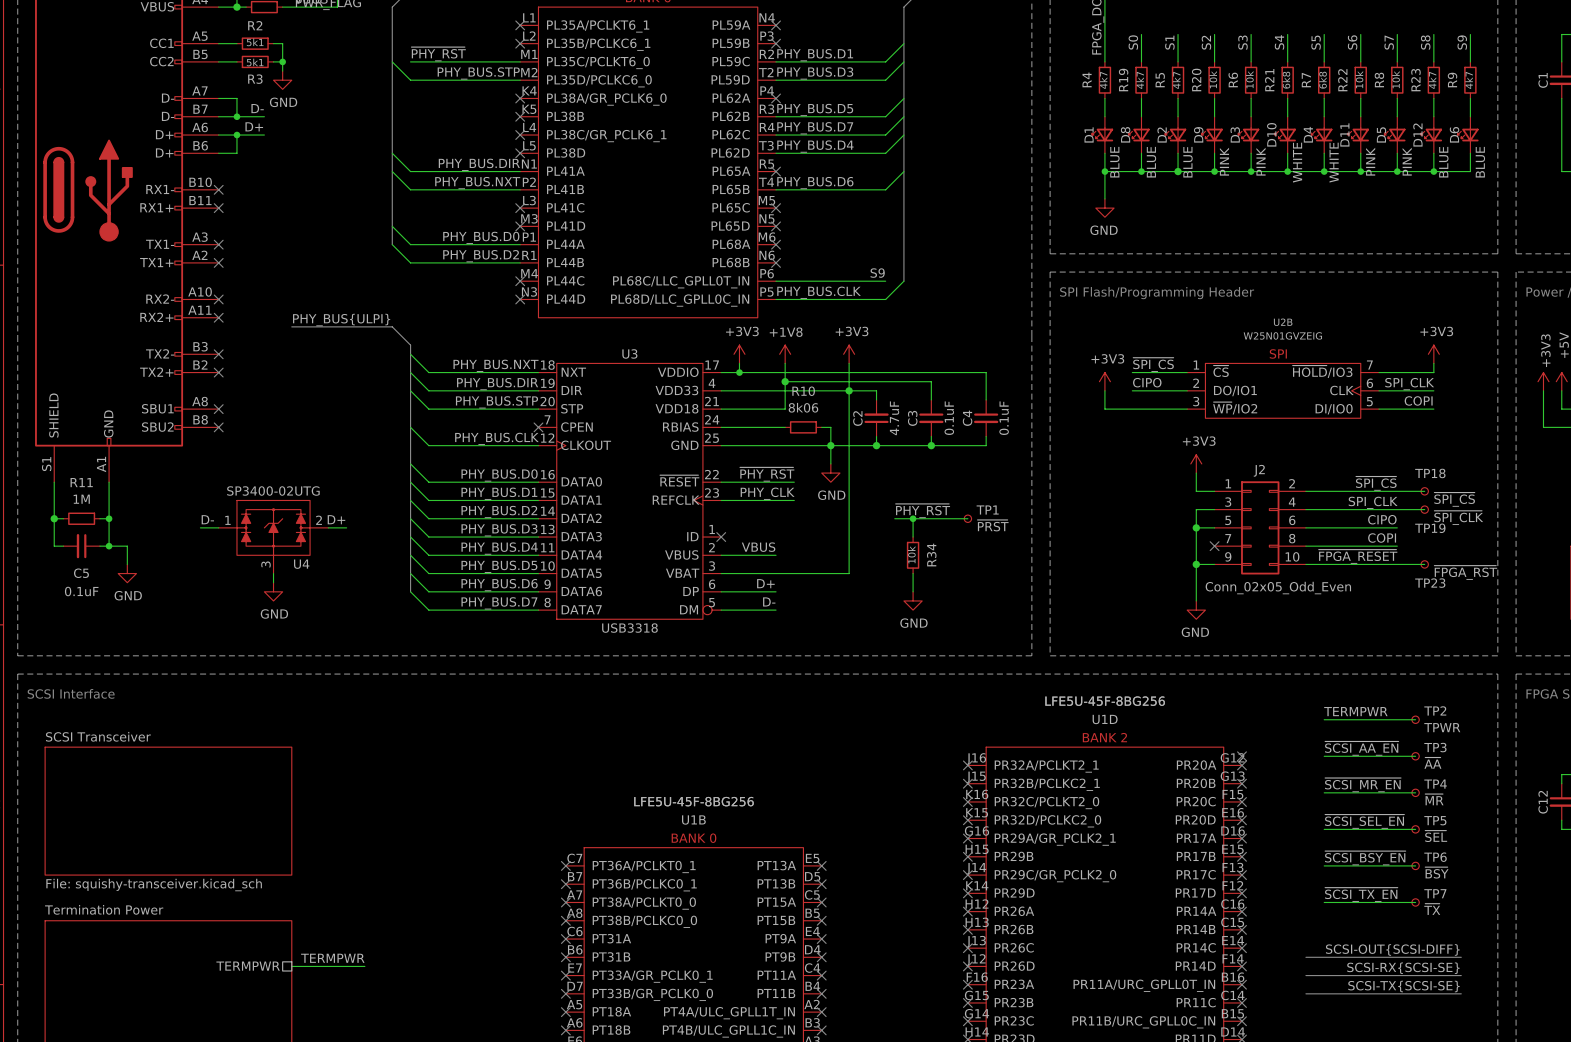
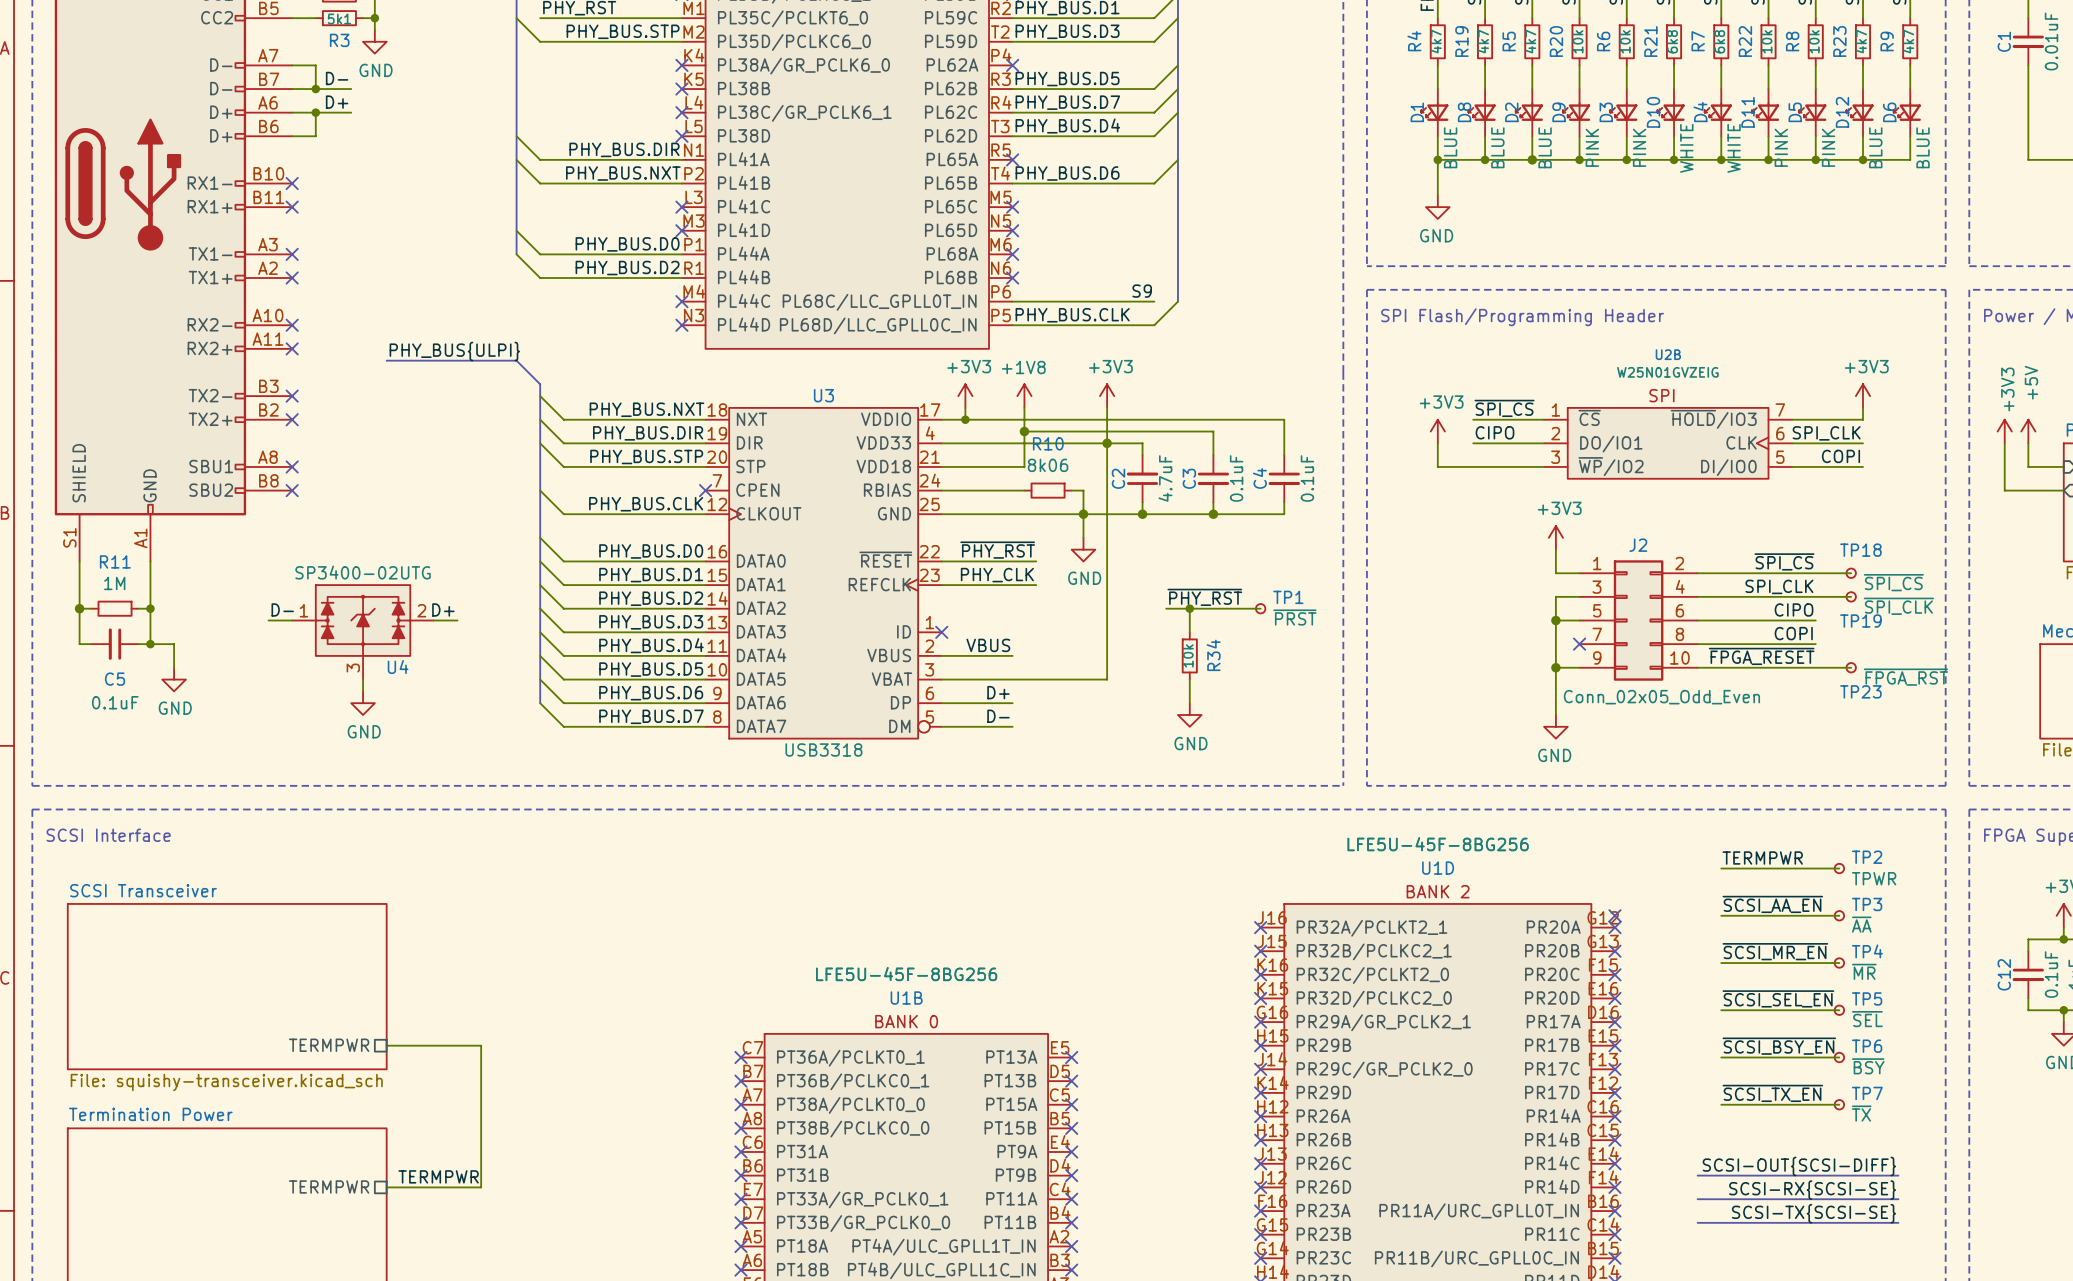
sheet pin: none -> TERMPWR (329, 1045)
wire: none -> (386, 1045) (481, 1045) (481, 1187)

